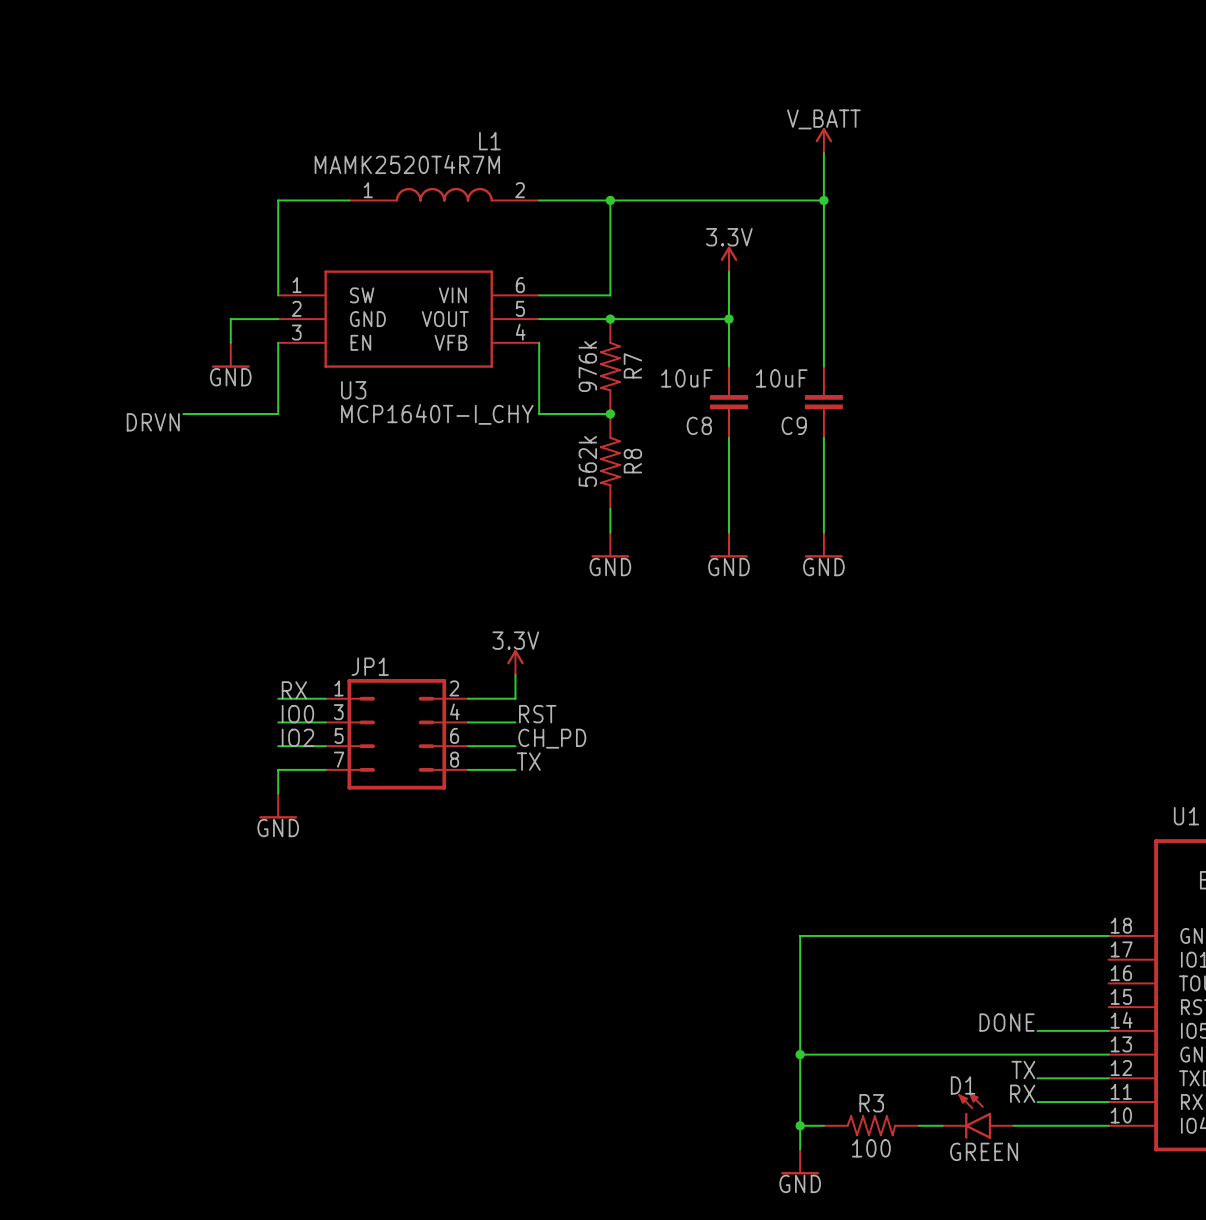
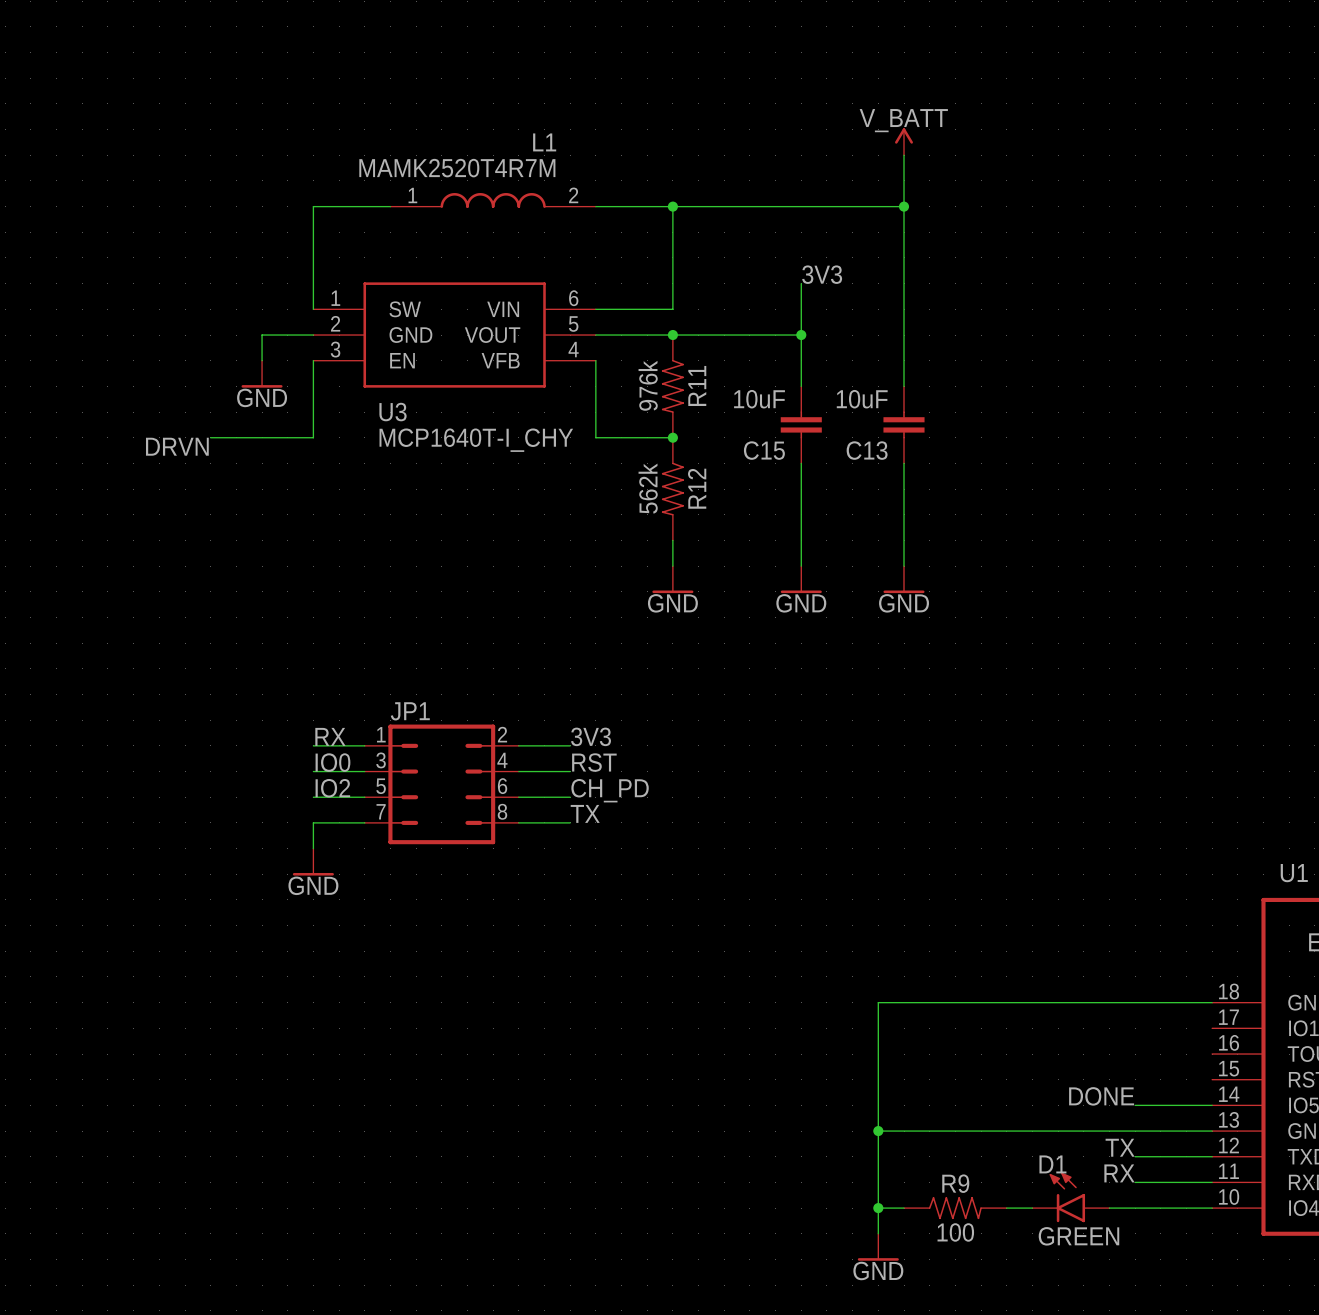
power symbol: 3.3V (729, 259) -> none
label: none -> 3V3 (822, 274)
R7 name: R7 (632, 365) -> R11 (697, 385)
C8 name: C8 (699, 425) -> C15 (764, 450)
C9 name: C9 (794, 425) -> C13 (867, 450)
R8 name: R8 (632, 461) -> R12 (697, 488)
power symbol: 3.3V (515, 662) -> none
wire: (515, 674) (515, 698) -> none
label: none -> 3V3 (591, 736)
R3 name: R3 (871, 1103) -> R9 (955, 1183)

